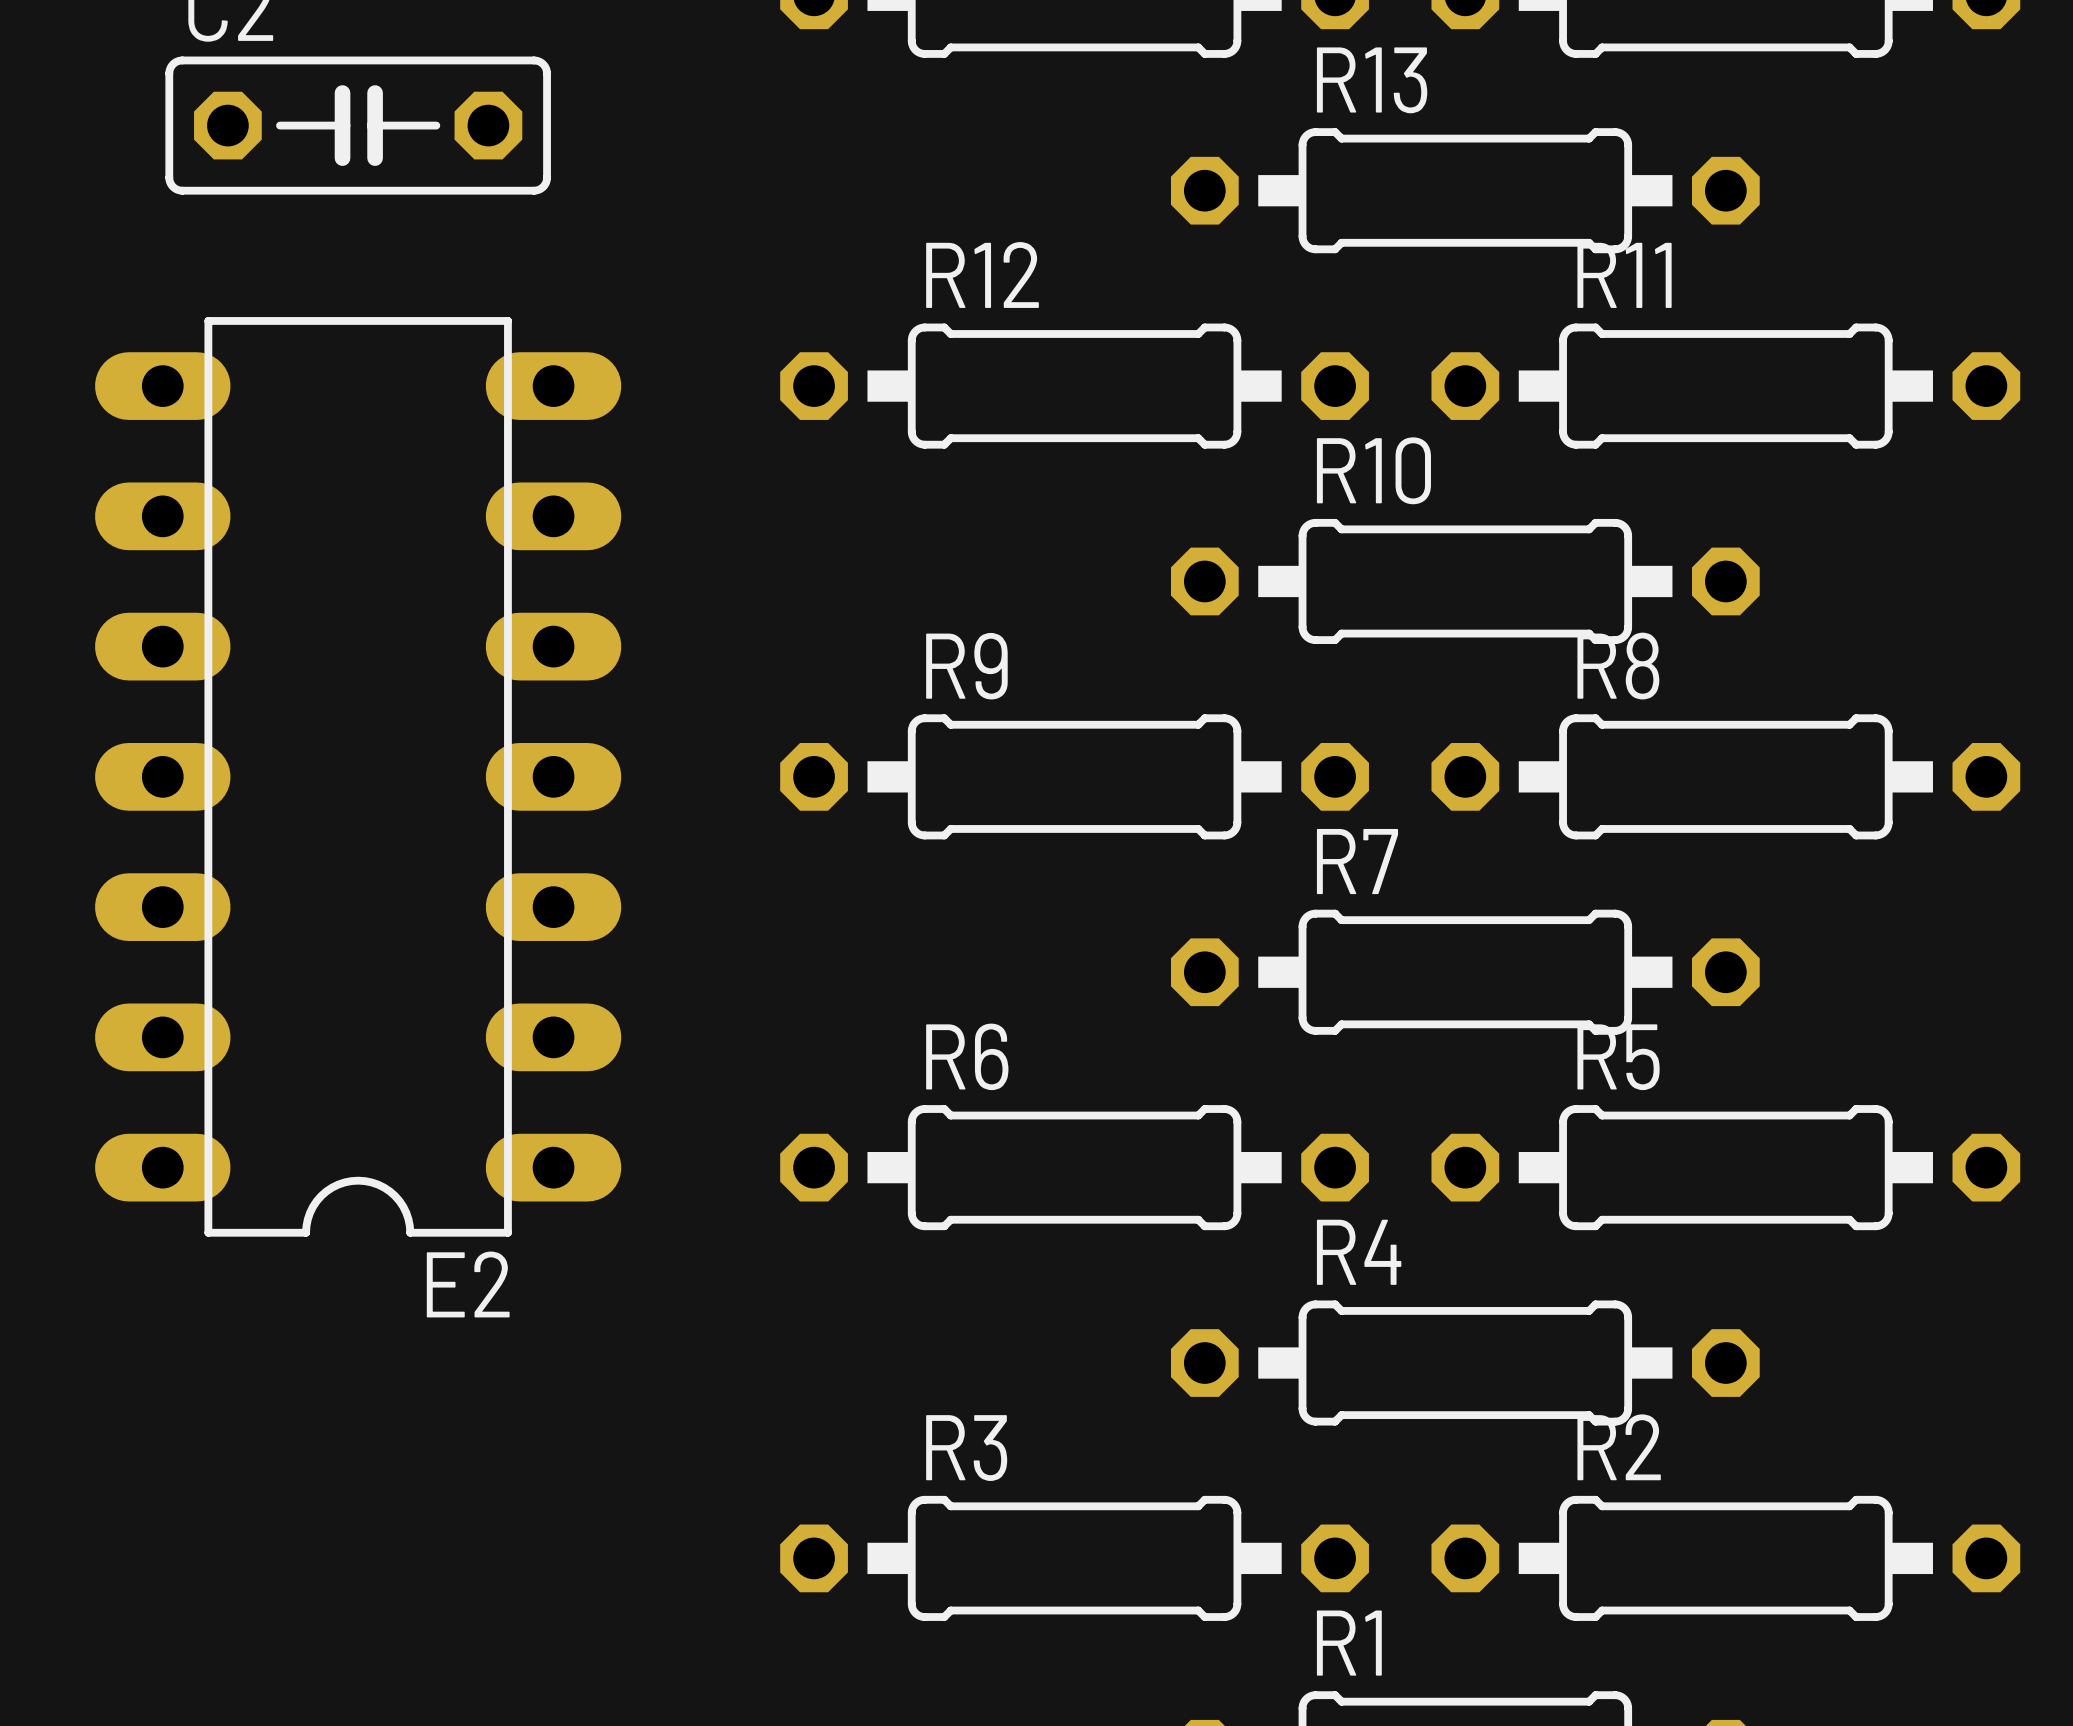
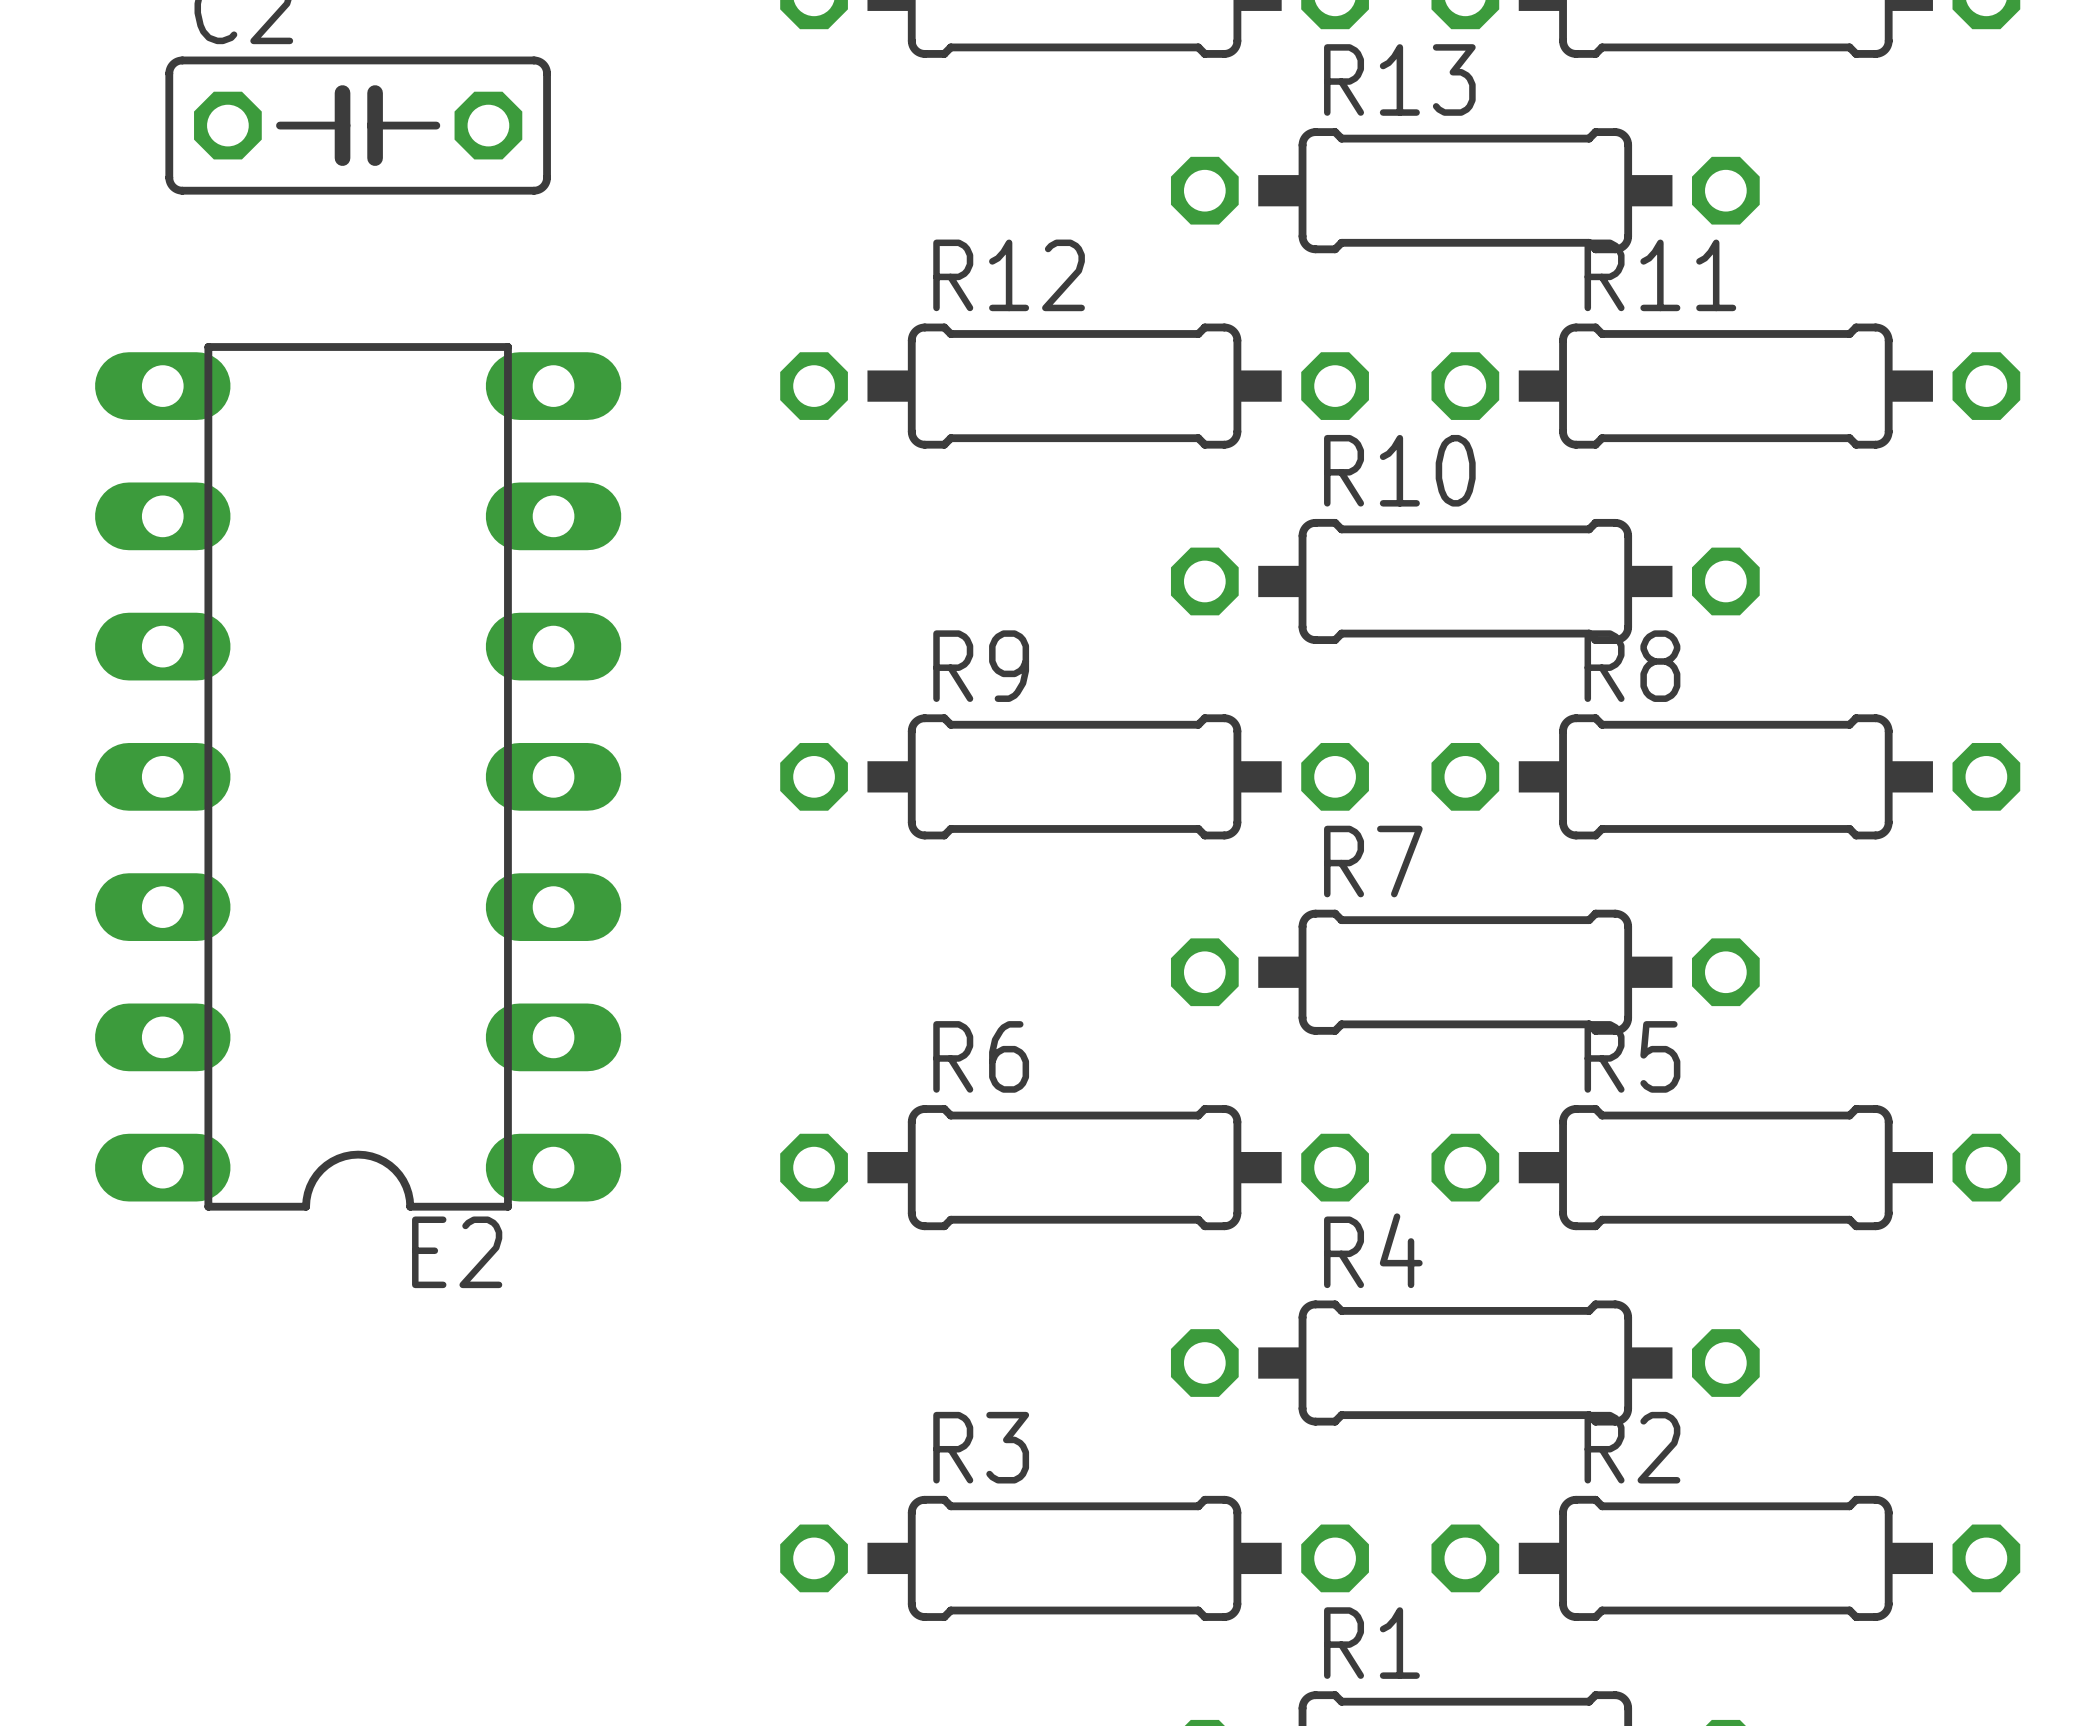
E2 footprint: [95, 317, 622, 1237] -> [95, 343, 622, 1211]
E2 name position: E2 (468, 1284) -> E2 (457, 1252)

